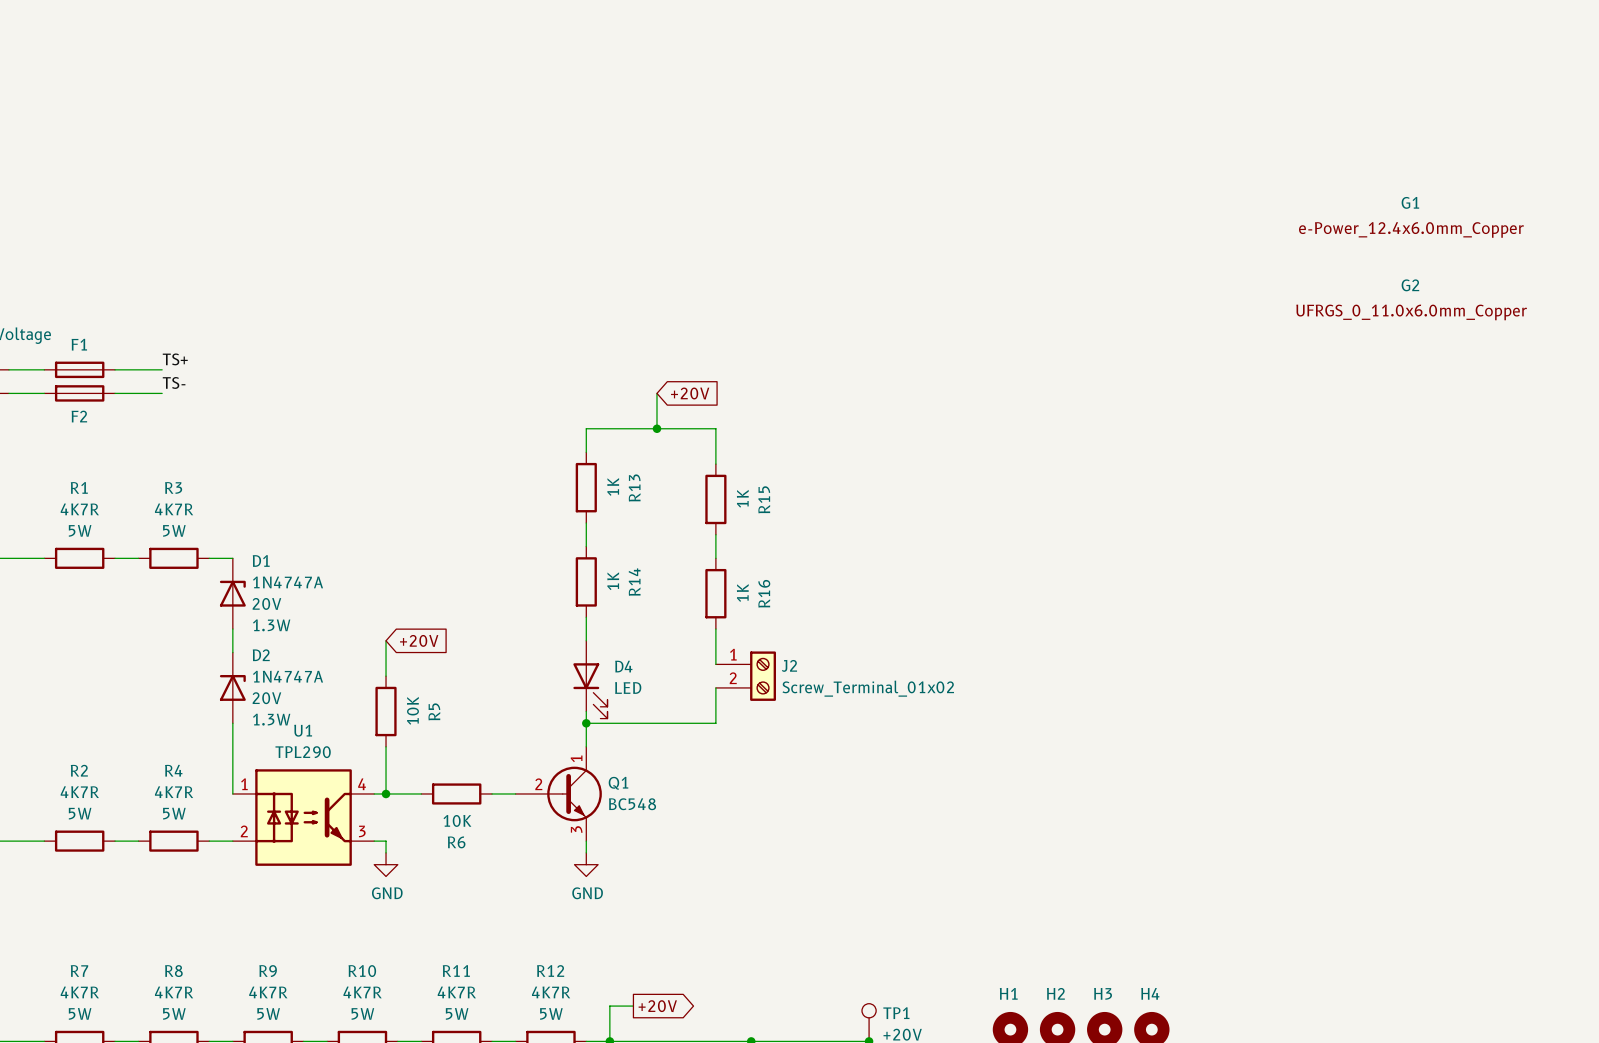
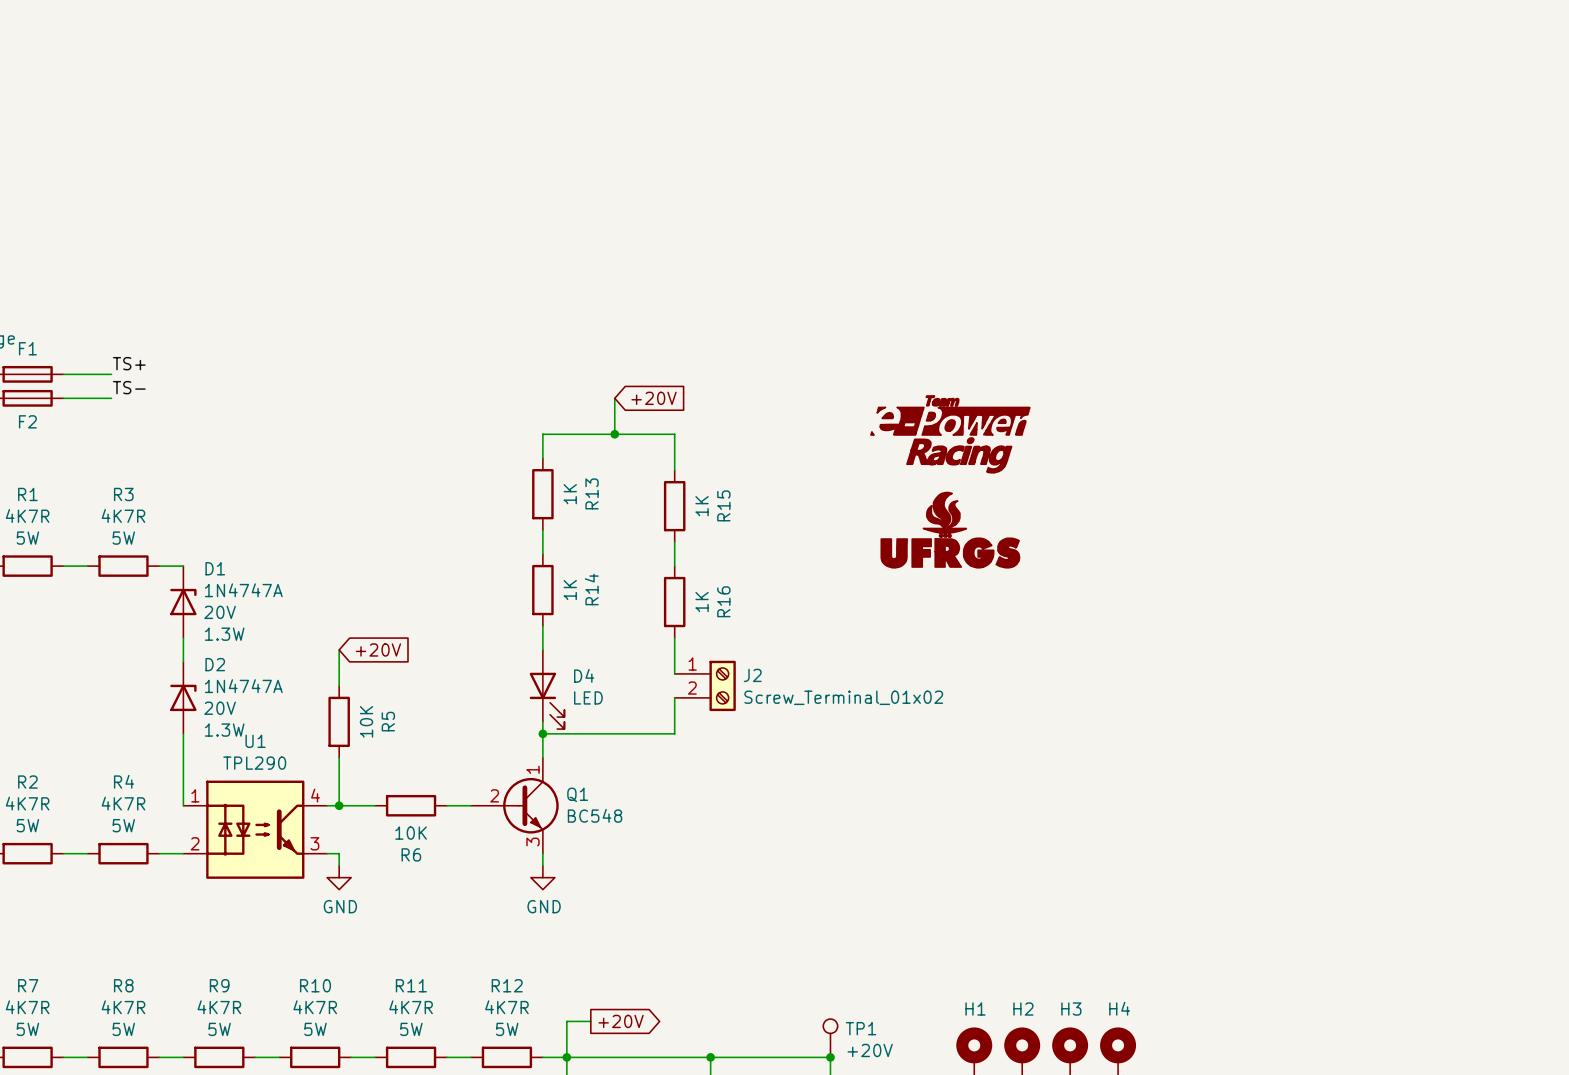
G1: (1411, 217) -> none
G2: (1411, 299) -> none
part: none -> (950, 434)
part: none -> (950, 530)

